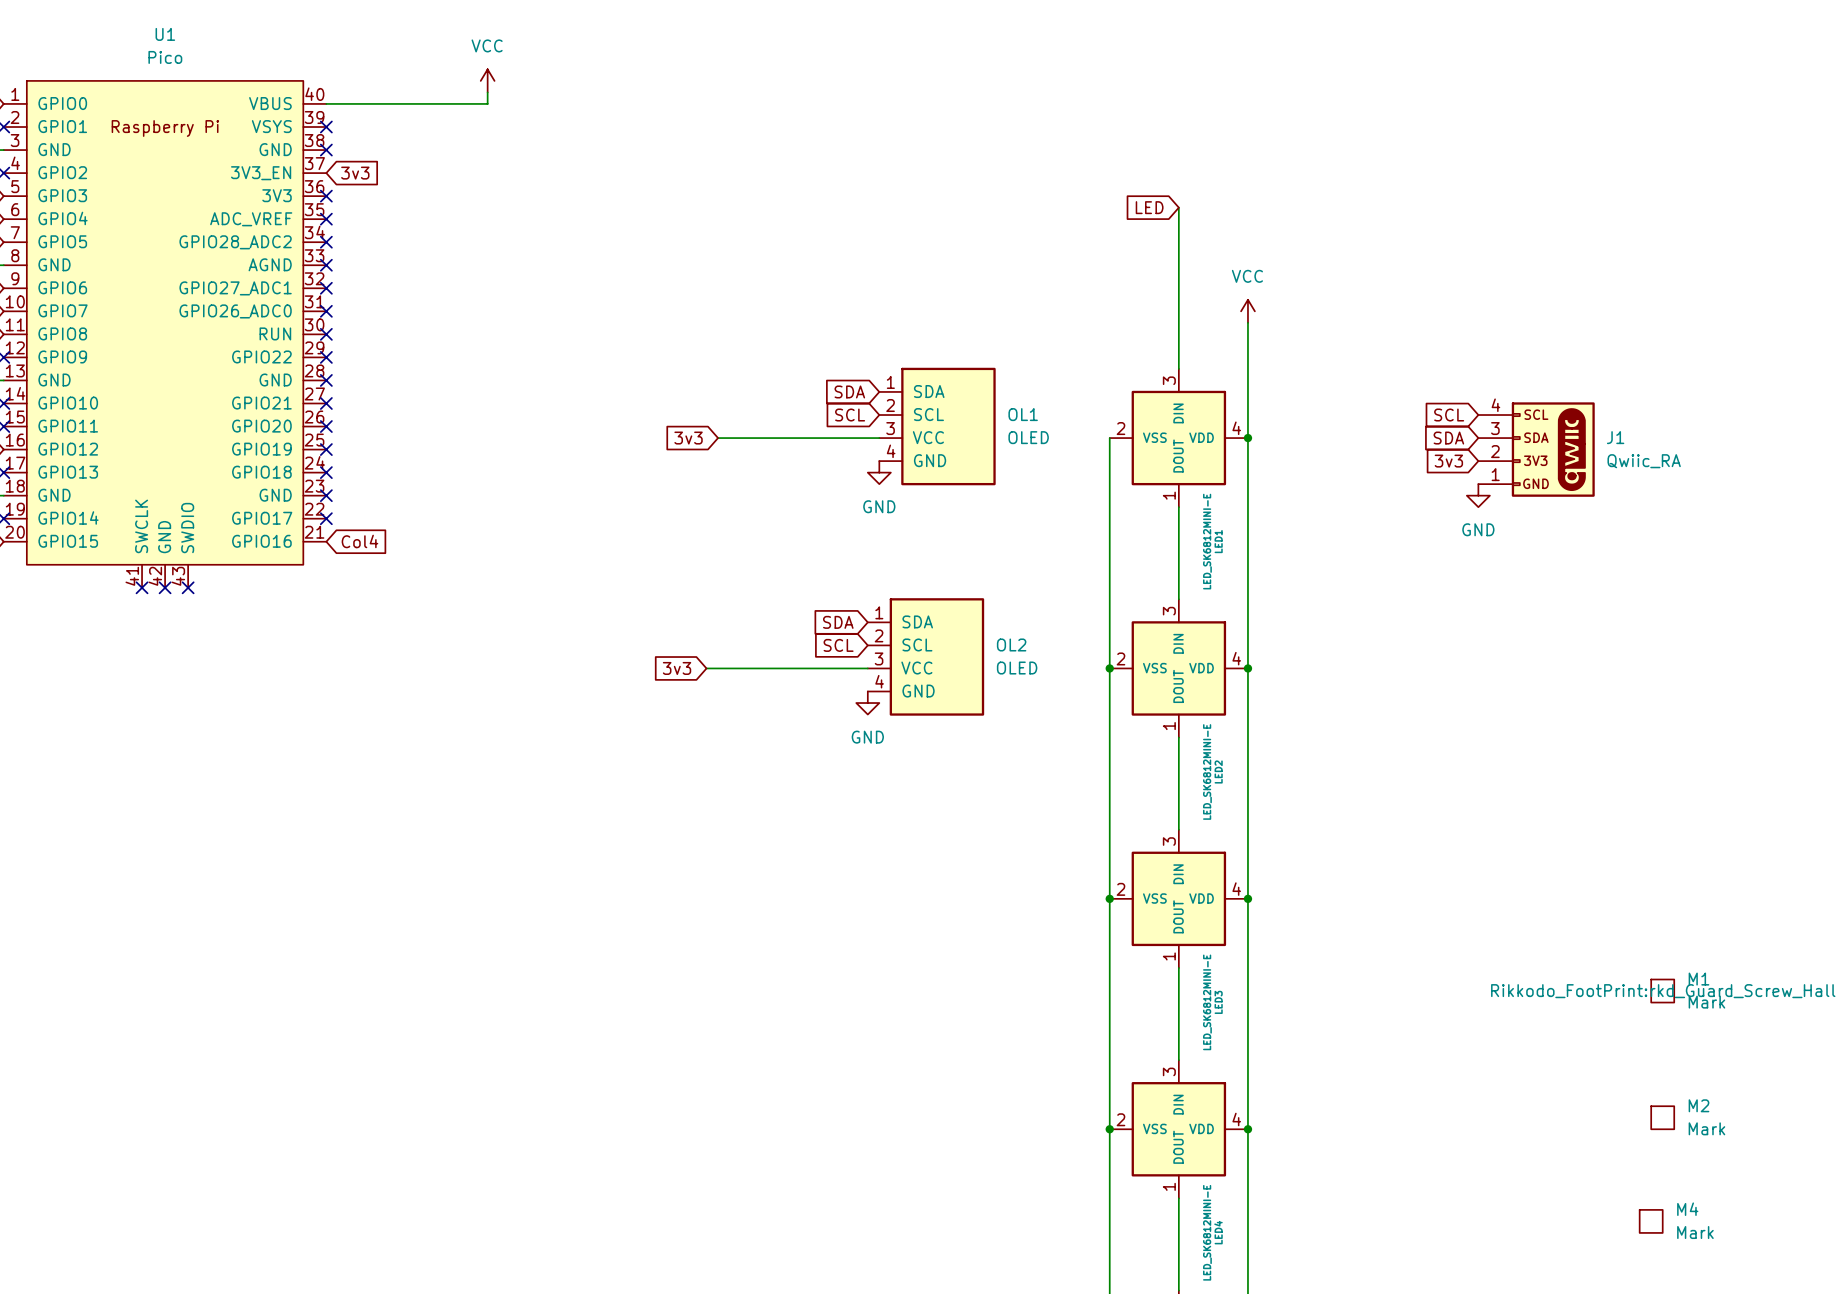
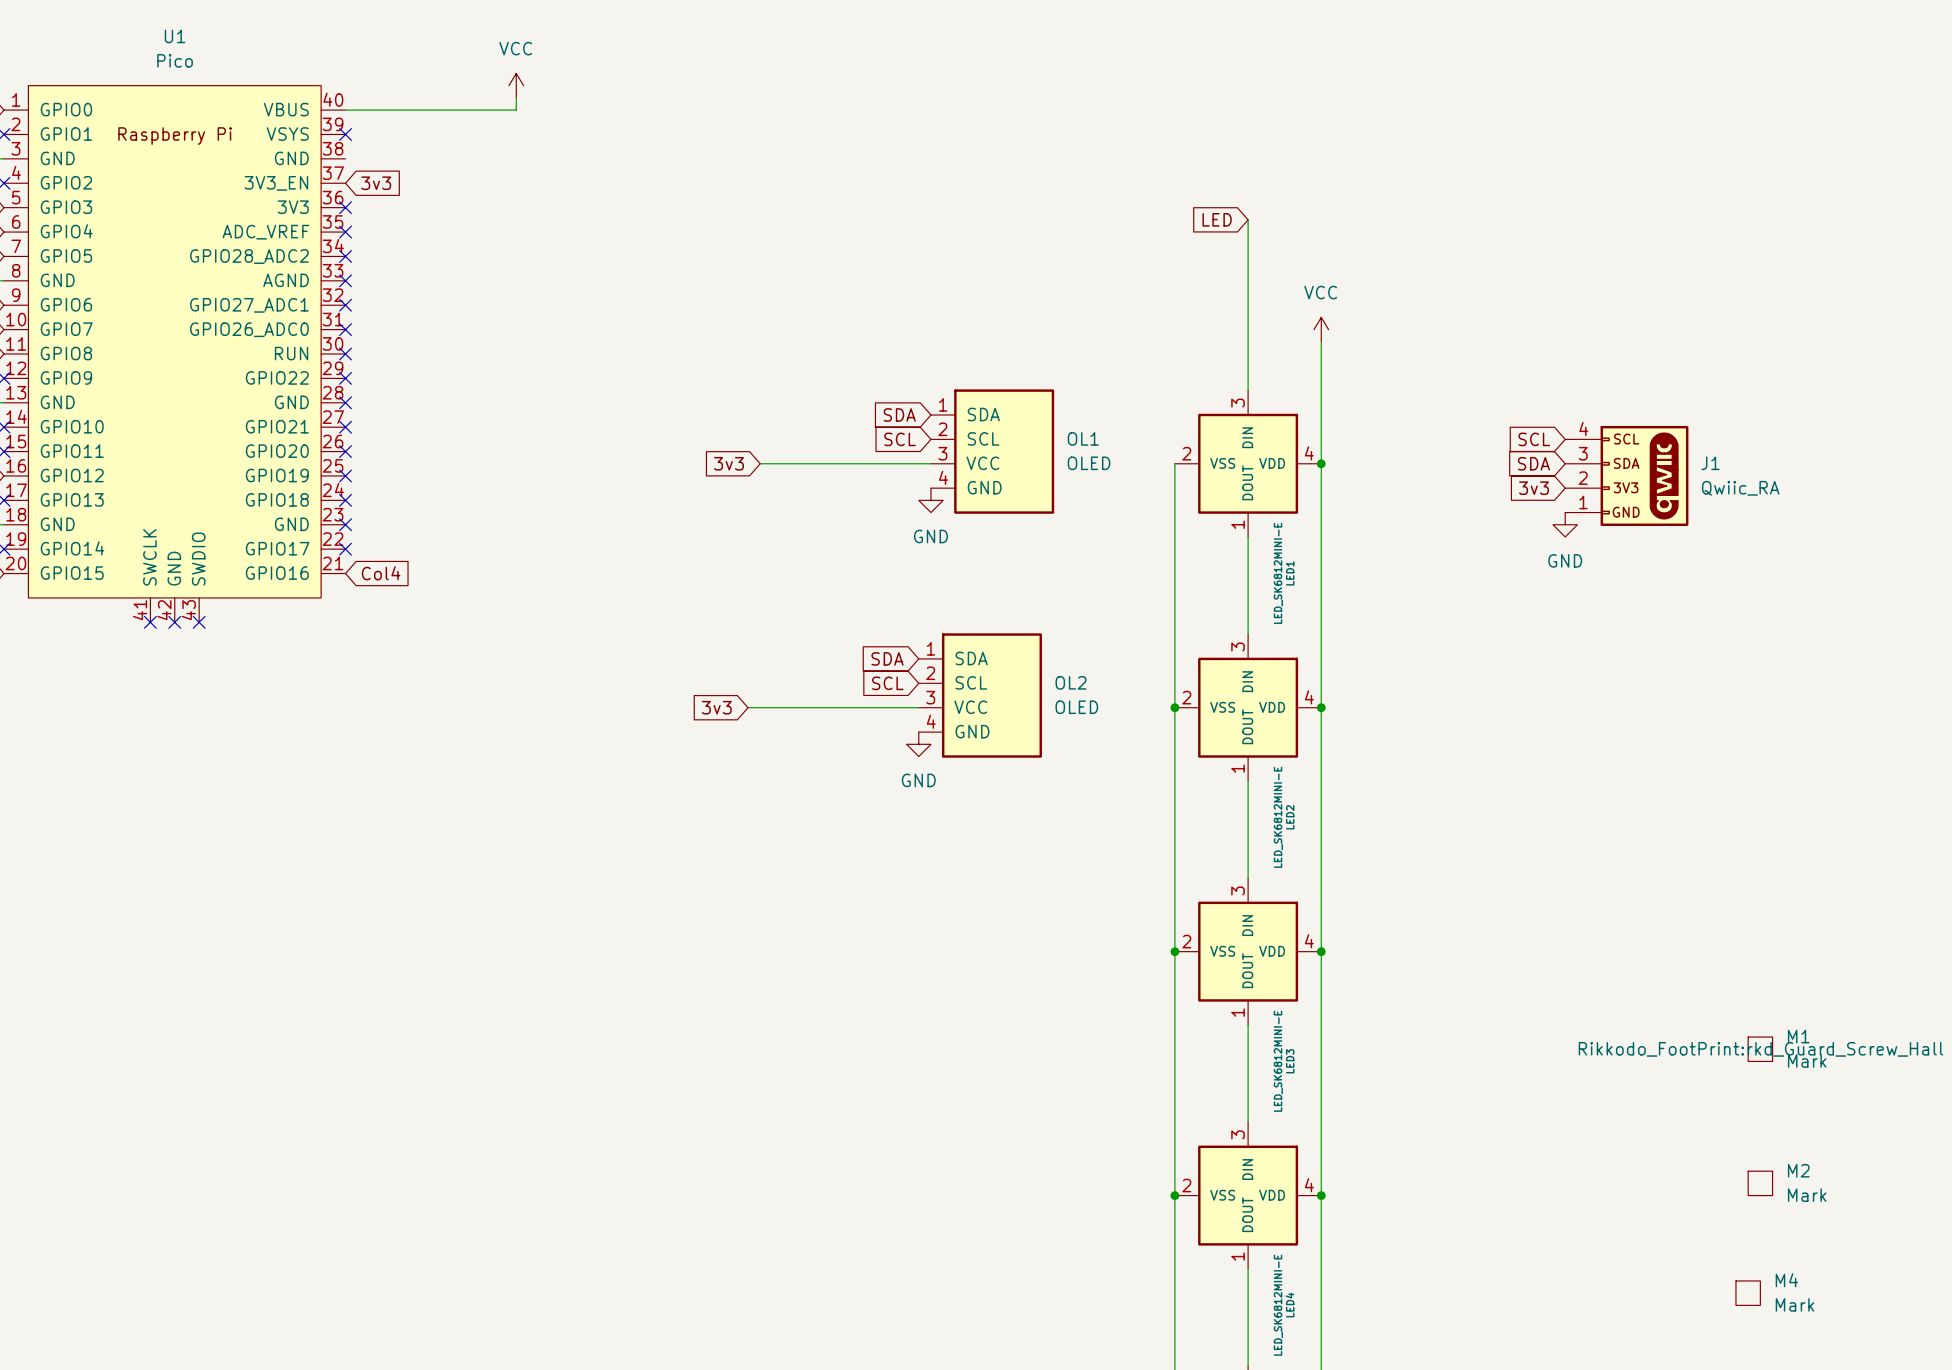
no-connect mark: (326, 150) -> none

